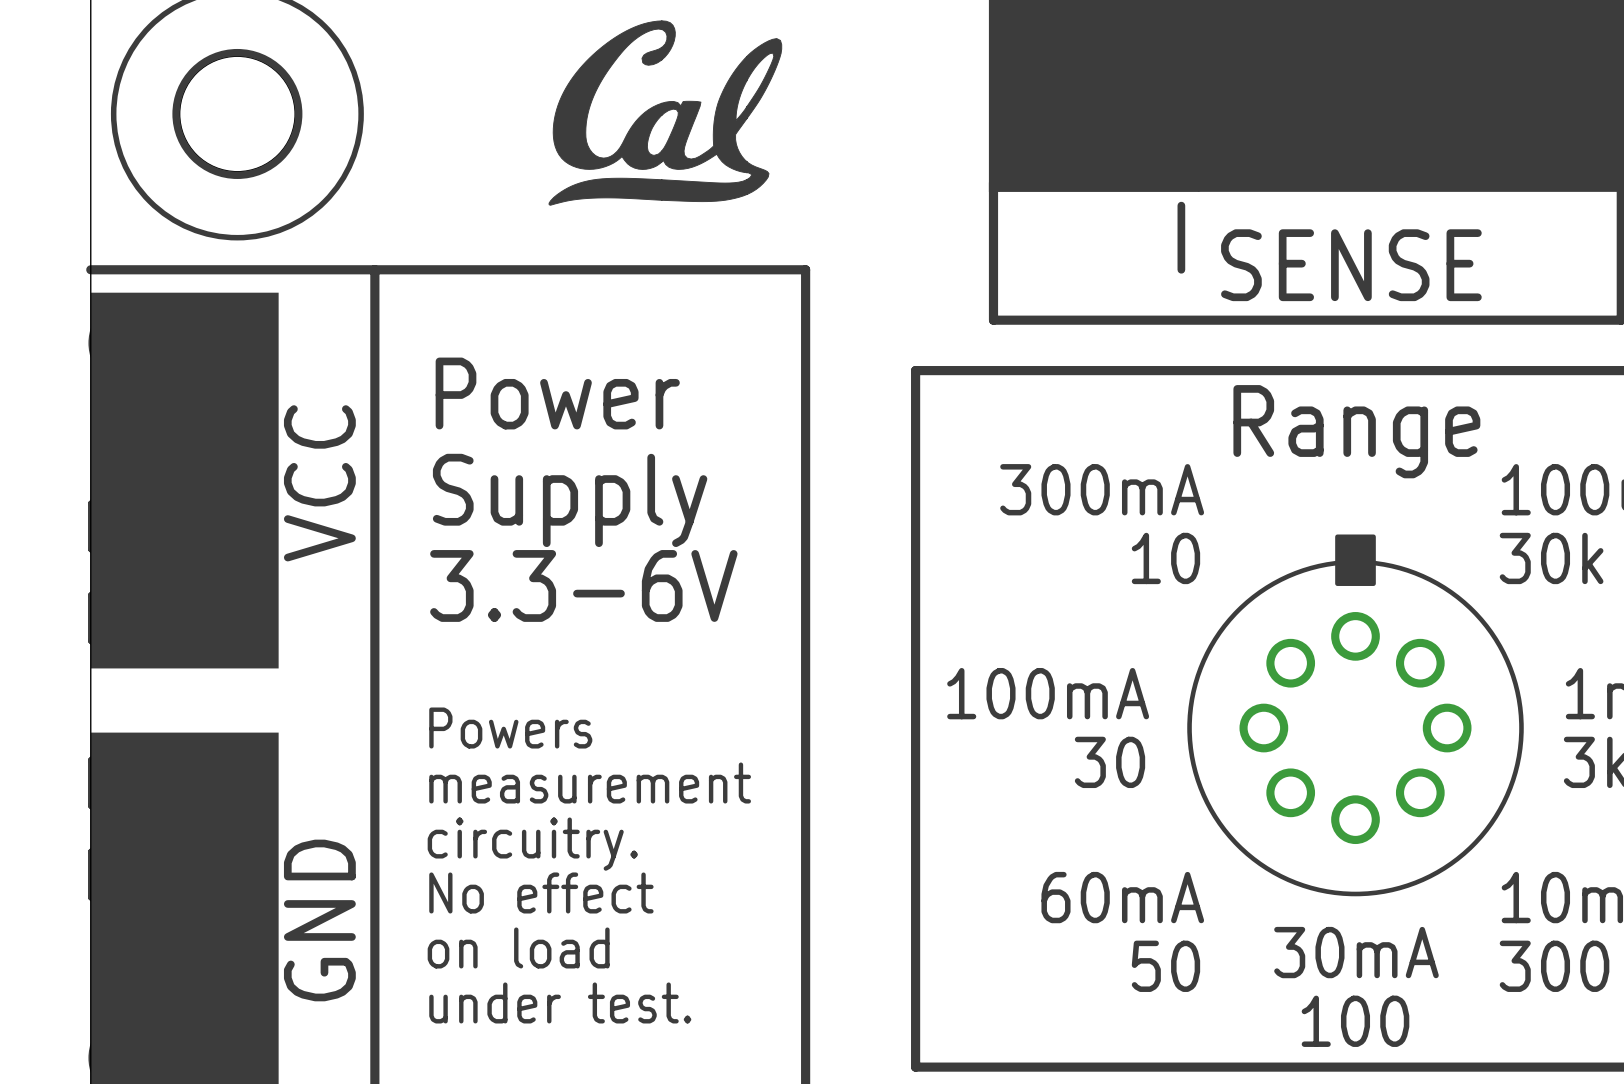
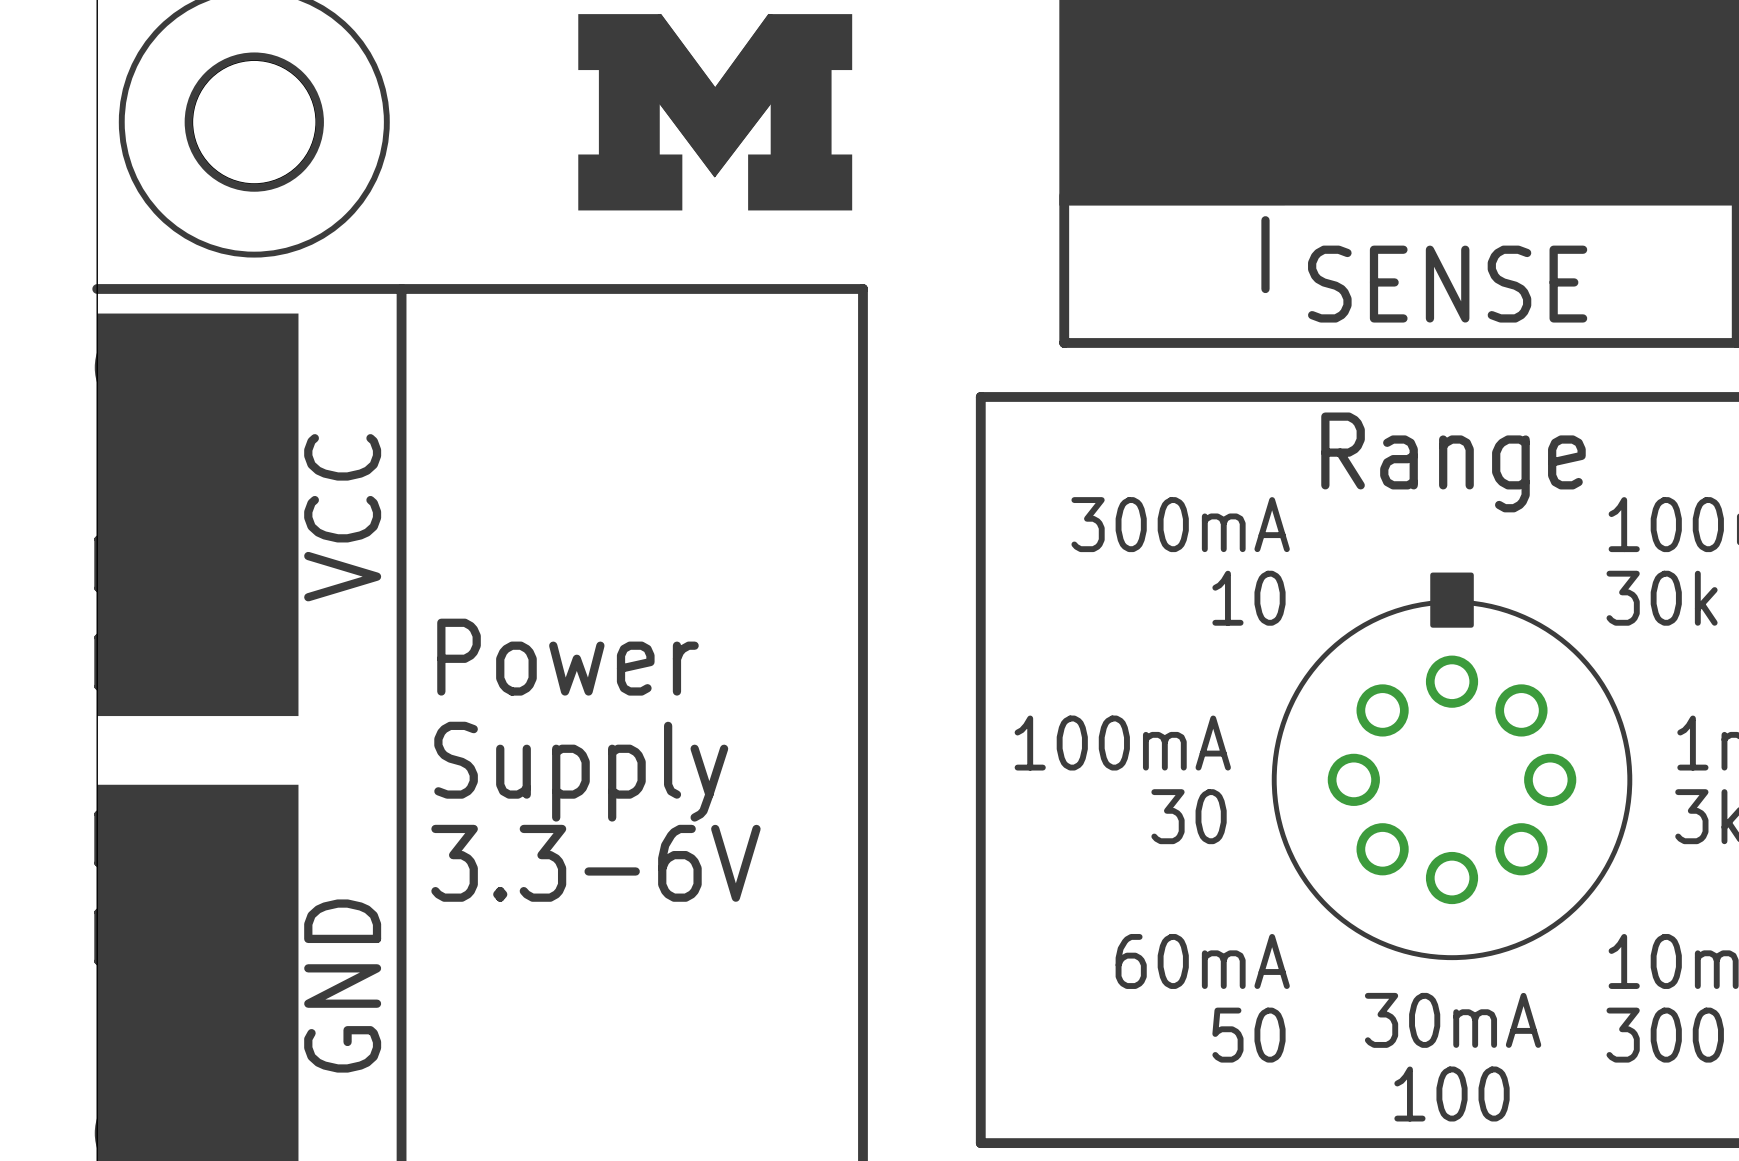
drawing shape: [548, 20, 783, 206] -> [578, 14, 853, 211]
text position: Power (557, 393) -> Power (567, 657)
text: Supply (570, 500) -> none
text position: 3.3-6V (583, 585) -> 3.3-6V (595, 863)
text: Powers (510, 728) -> Supply (581, 771)
text: measurement (590, 783) -> none
text: circuitry. (532, 844) -> none
text: No effect (541, 892) -> none
text: on load (518, 947) -> none
text: under test. (560, 1002) -> none

